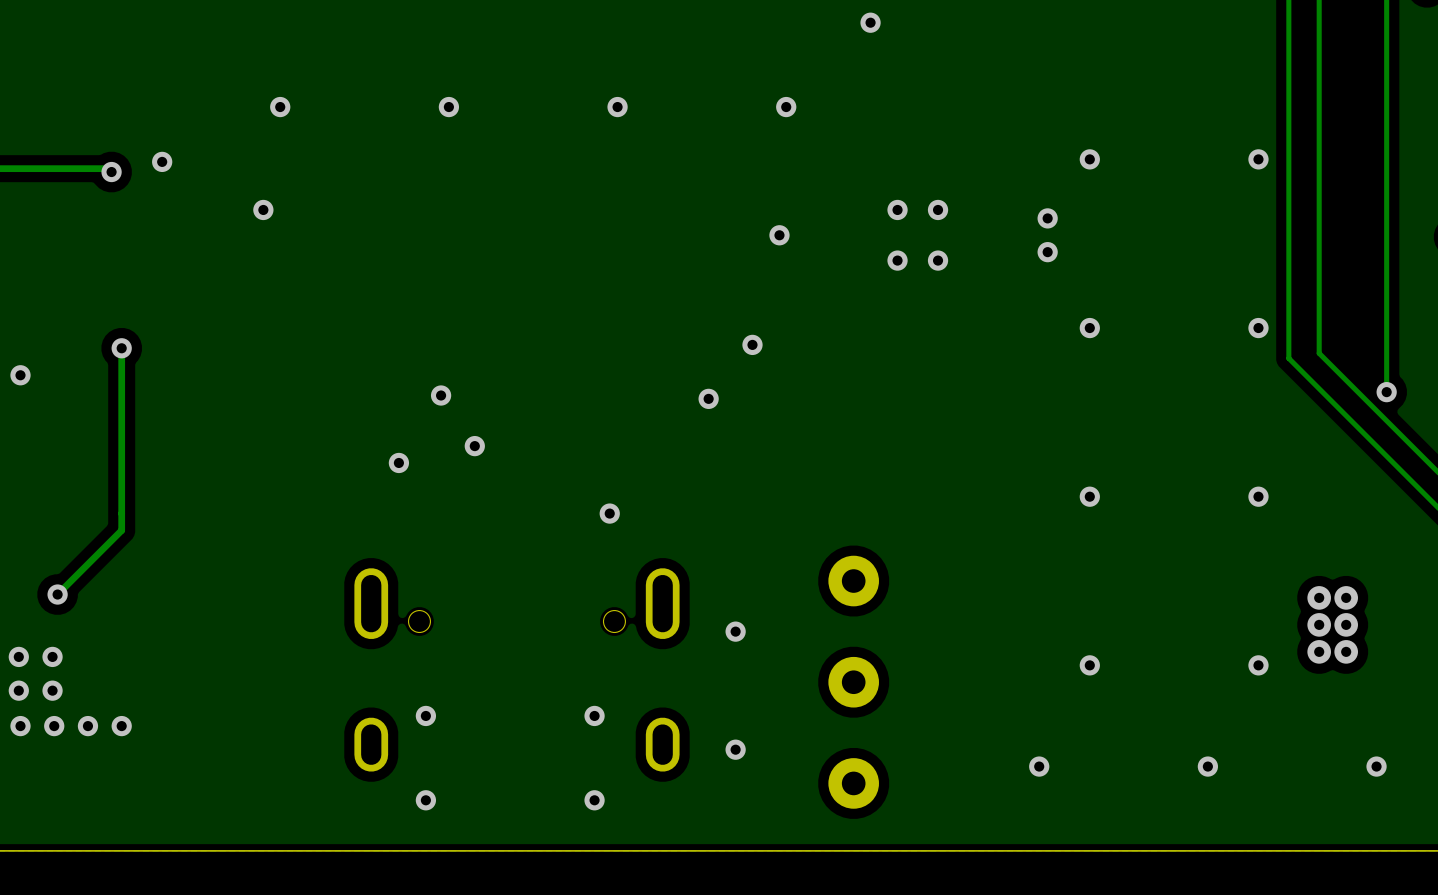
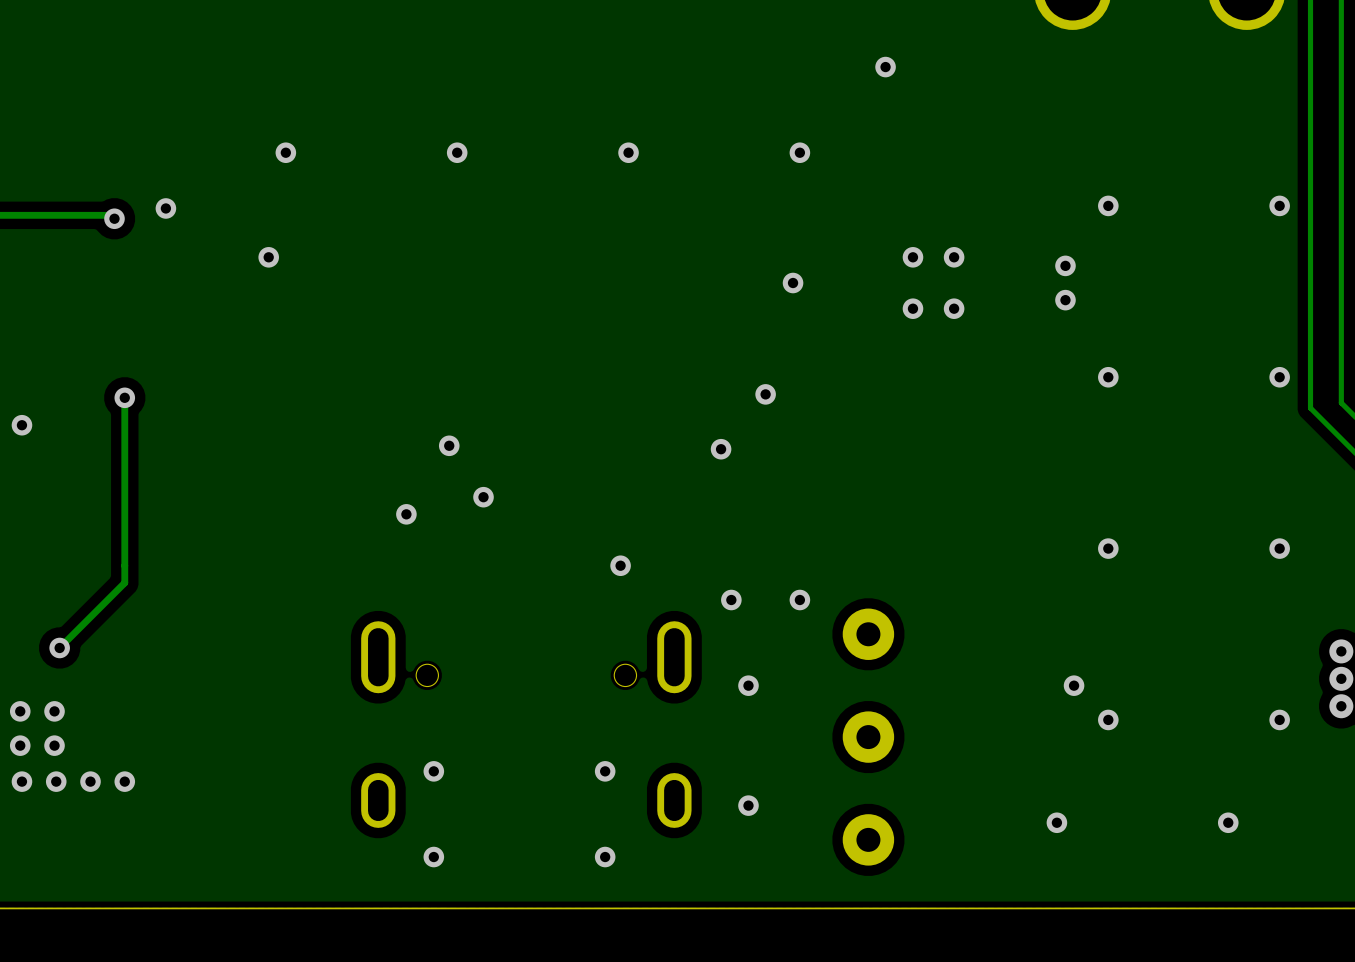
via: none -> (731, 600)
via: none -> (799, 600)
via: none -> (1074, 685)

